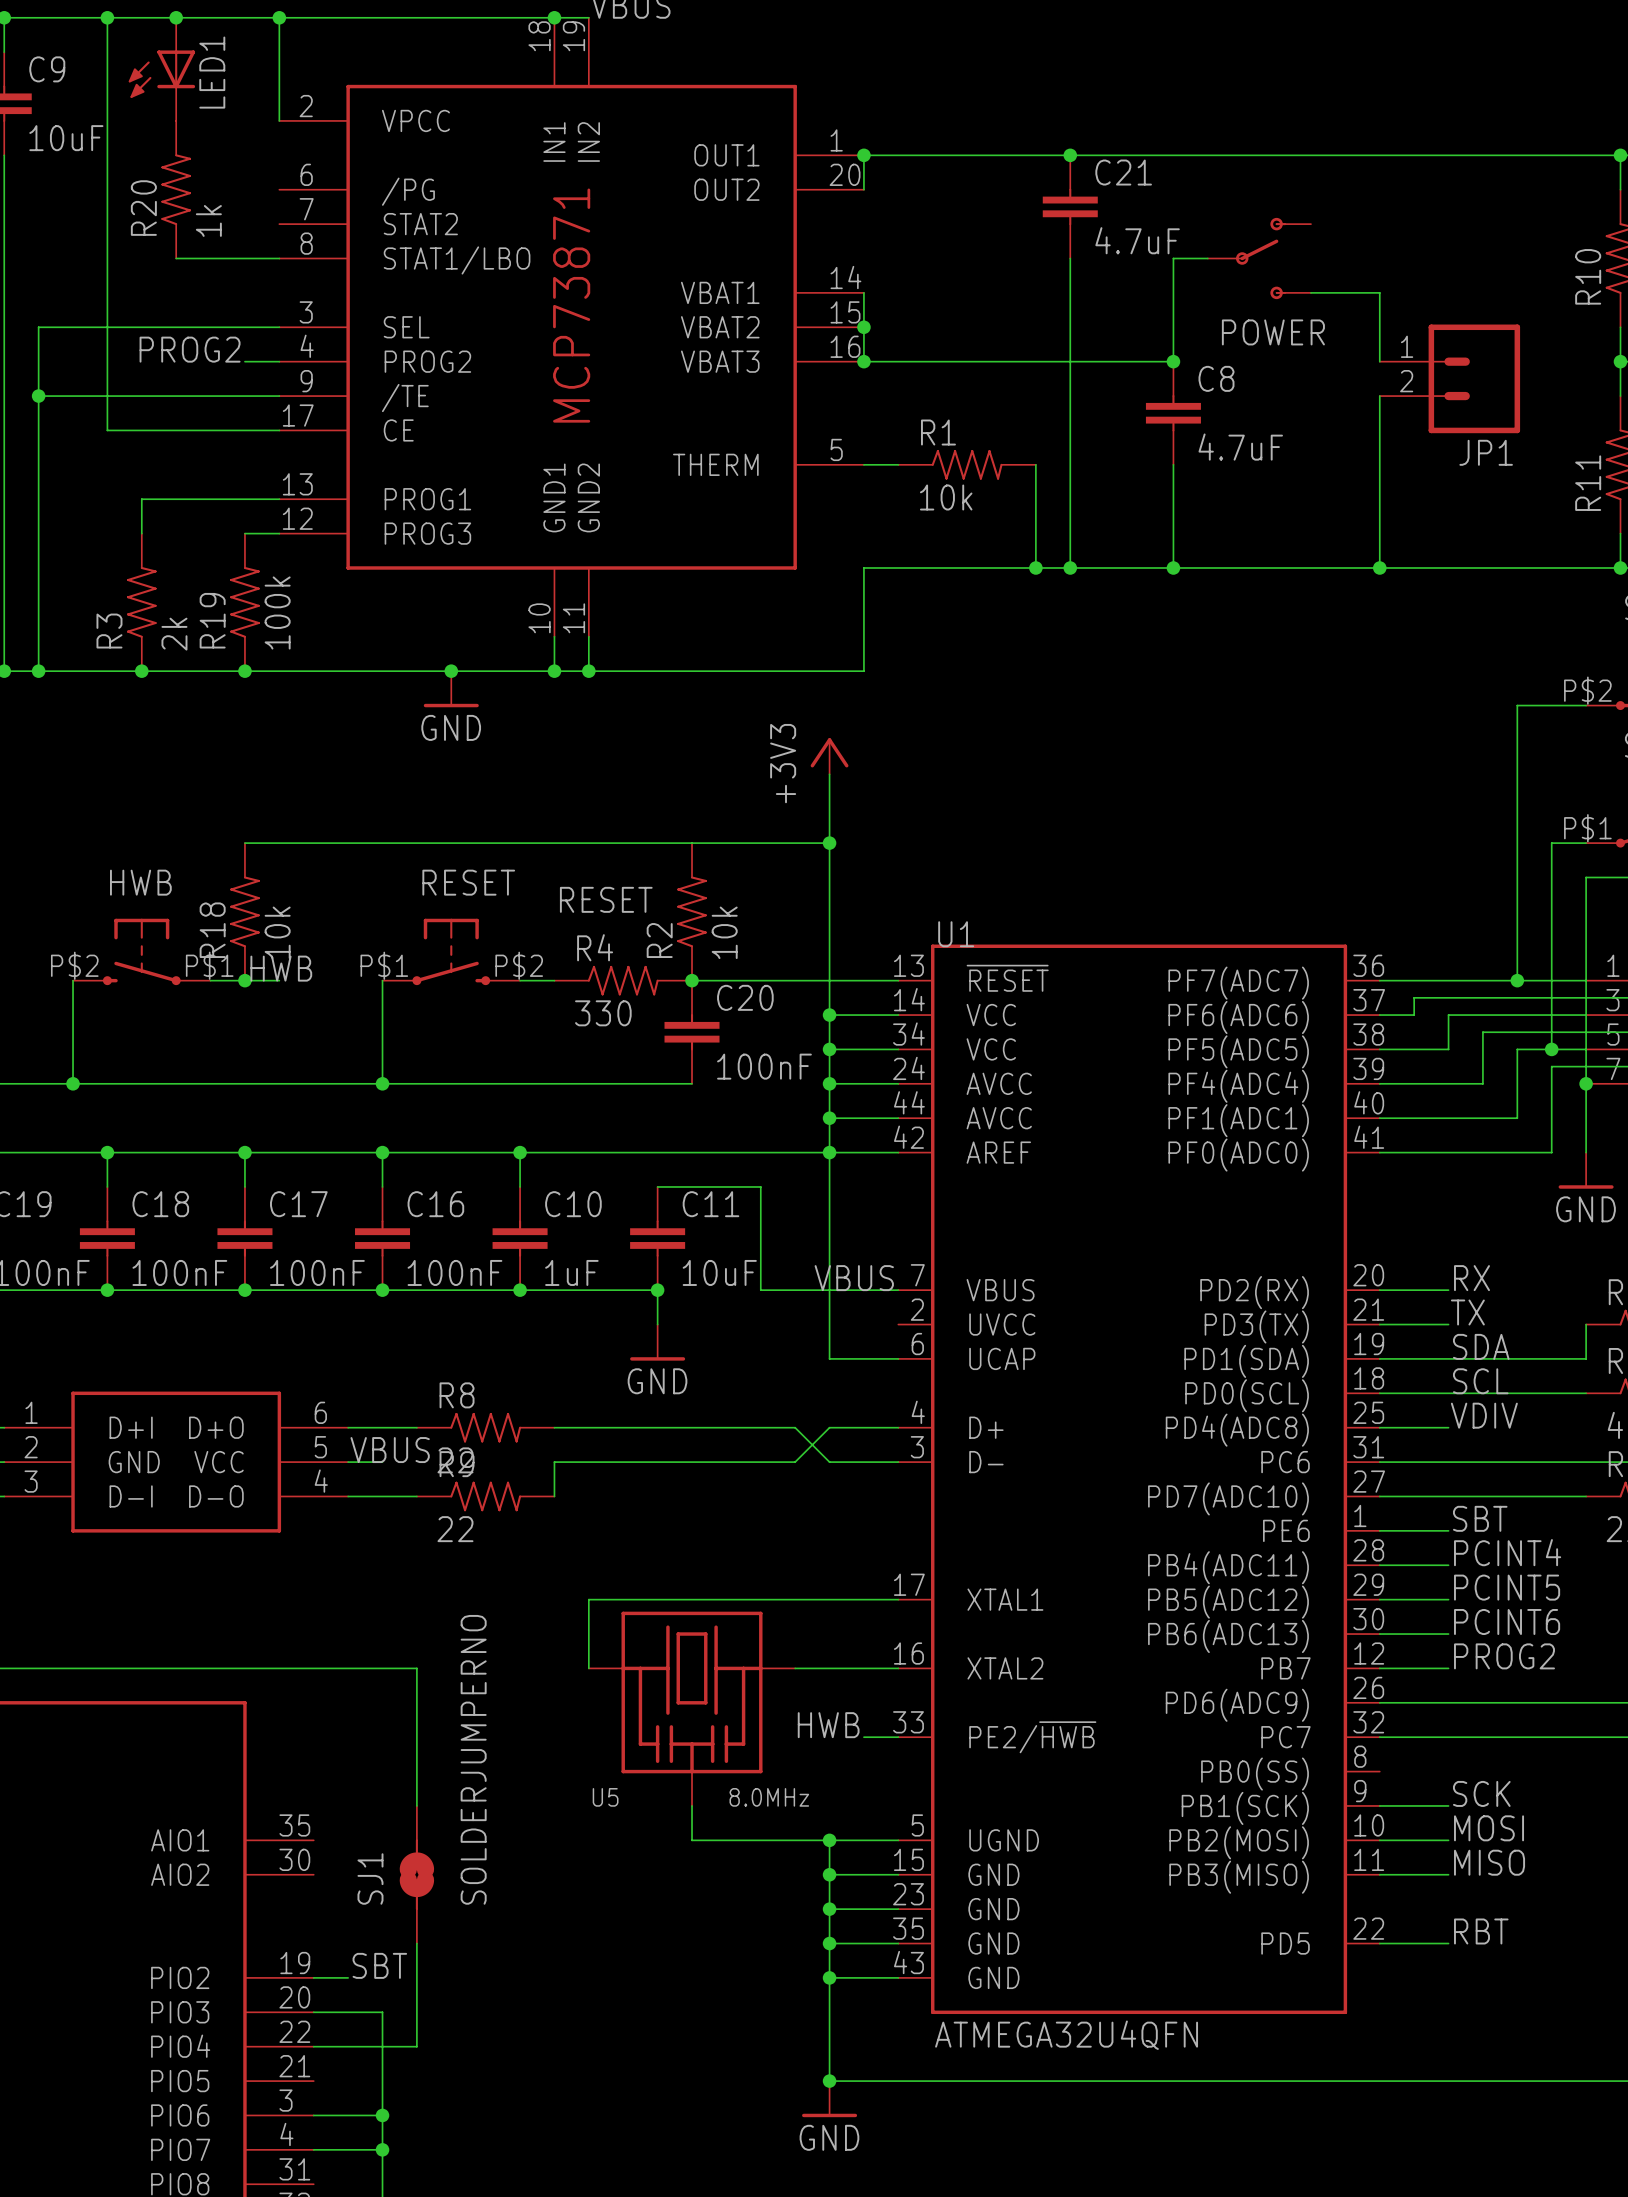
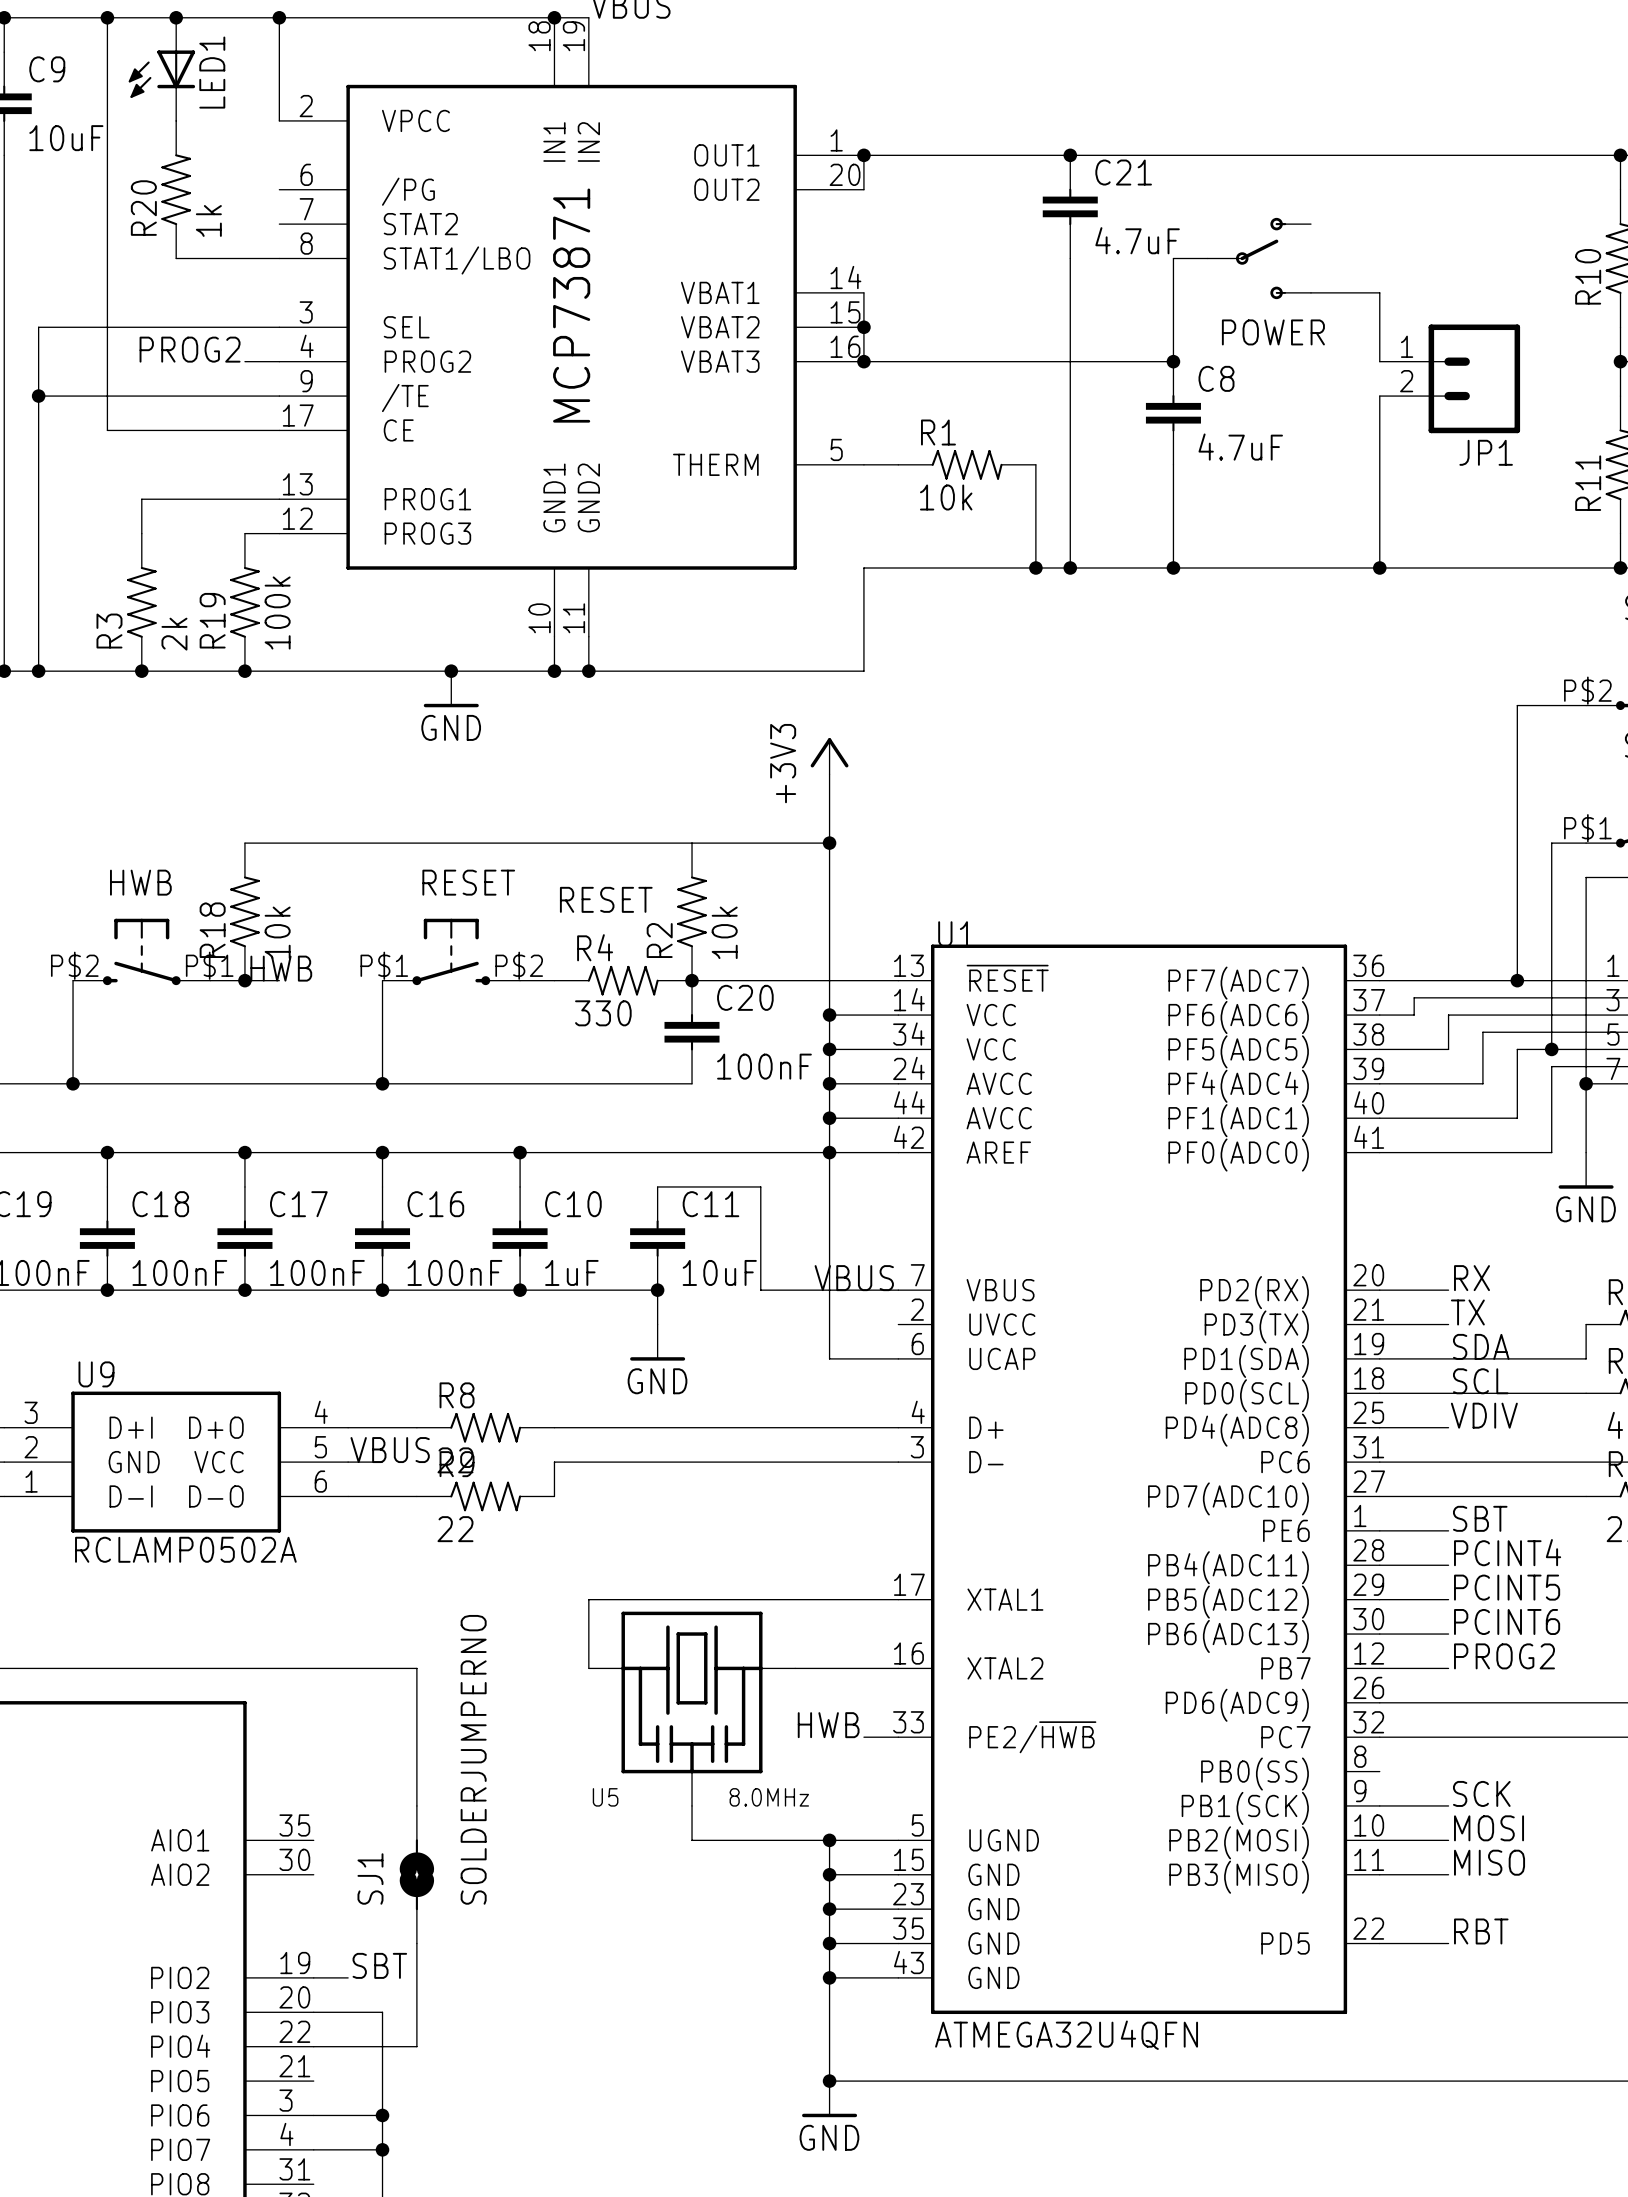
U9 name: none -> U9 (96, 1374)
U9 pin number: 1 (31, 1412) -> 3 (31, 1412)
U9 pin number: 6 (320, 1412) -> 4 (321, 1412)
wire: (795, 1427) (829, 1462) -> (795, 1427) (829, 1427)
wire: (829, 1427) (795, 1462) -> (829, 1462) (795, 1462)
U9 pin number: 3 (31, 1481) -> 1 (31, 1481)
U9 pin number: 4 (321, 1481) -> 6 (320, 1481)
U9 value: none -> RCLAMP0502A (185, 1549)

